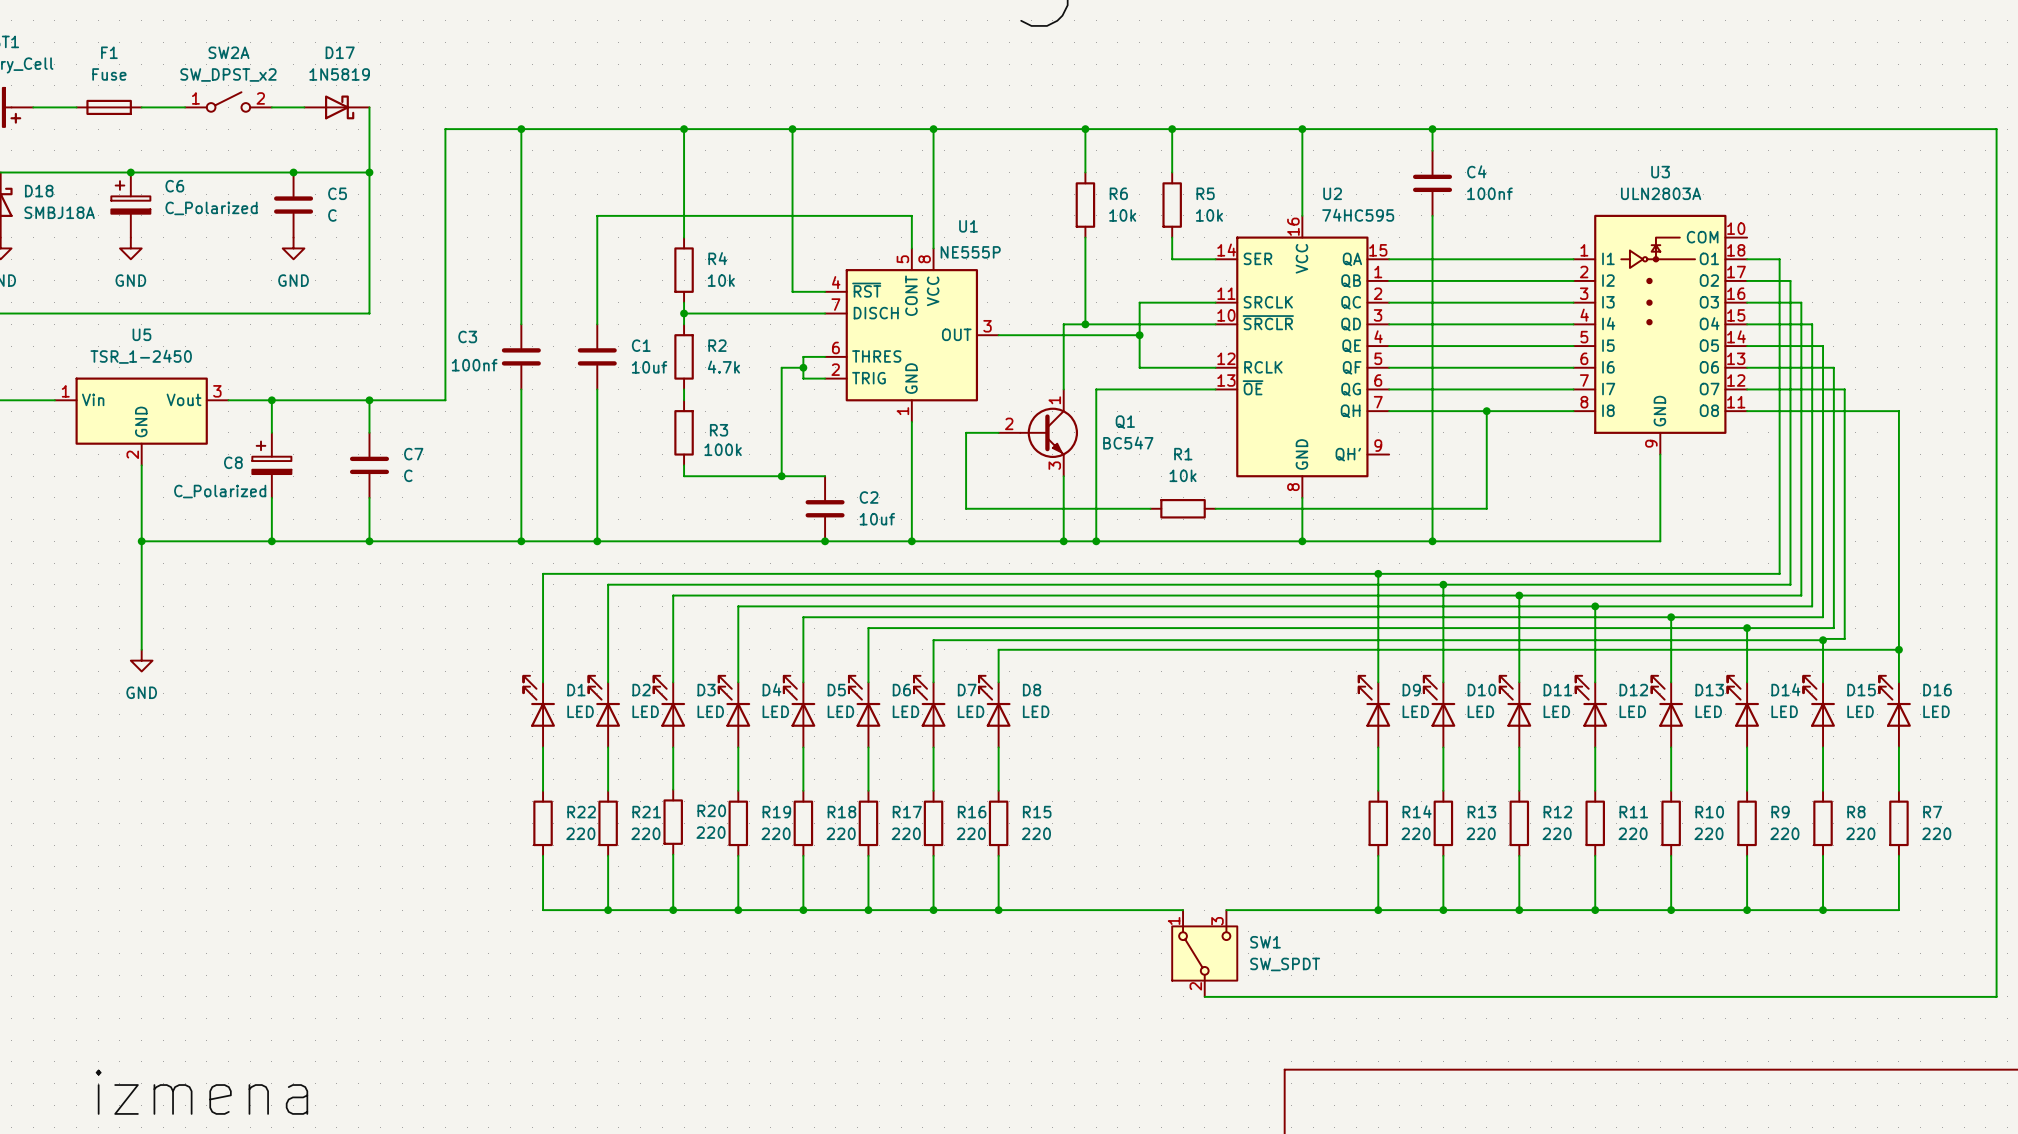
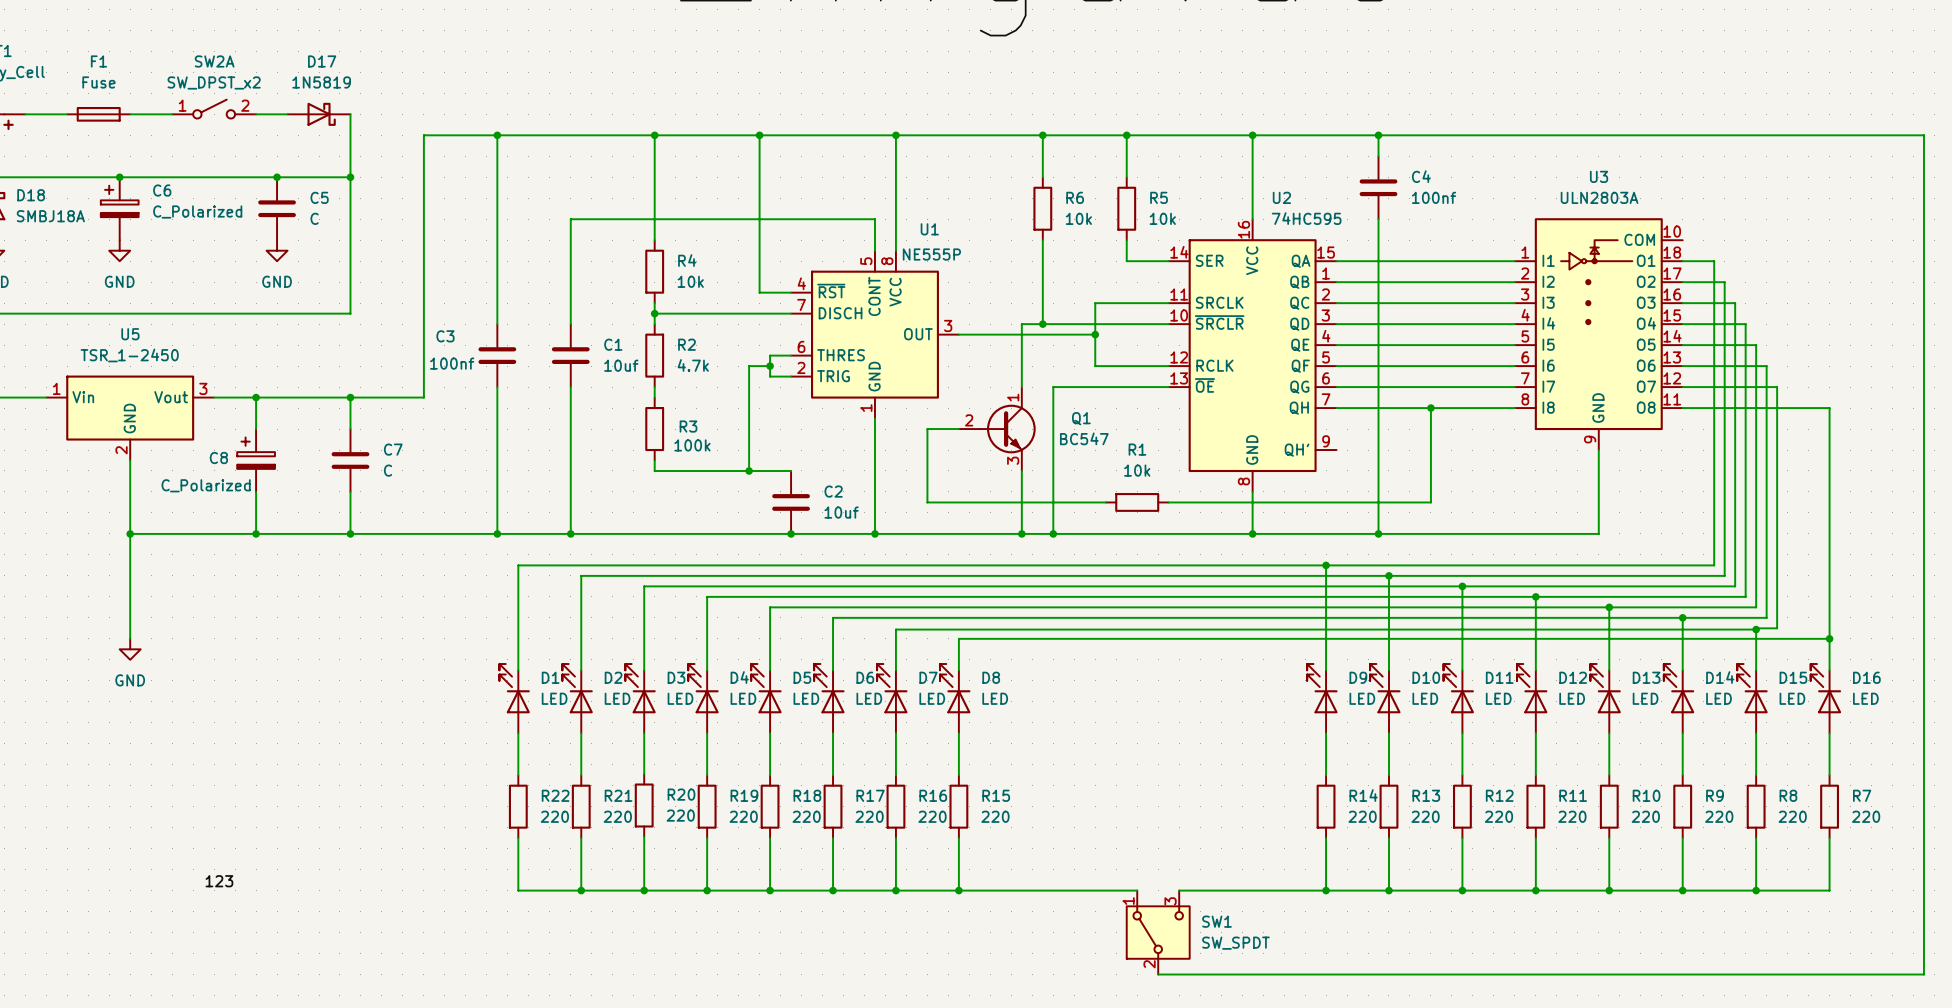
label: none -> 123 (219, 881)

